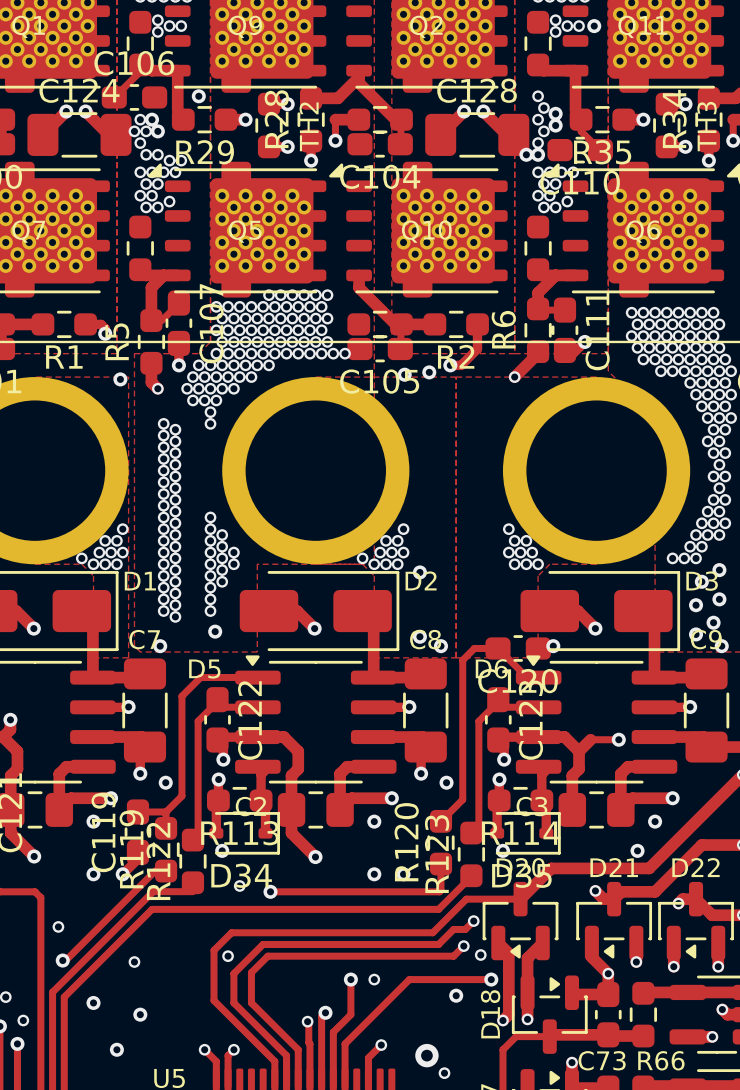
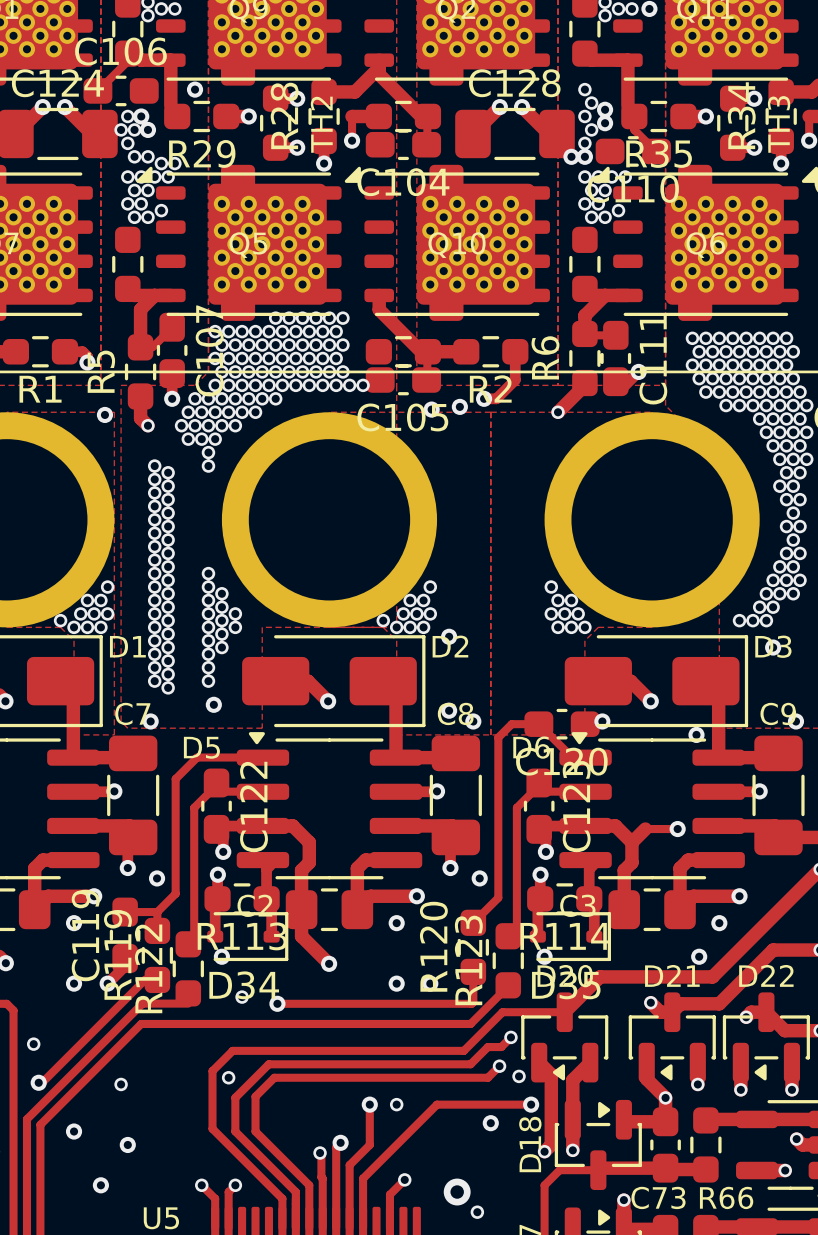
via: (719, 570) -> none
via: (719, 599) -> none
via: (696, 605) -> none
via: (713, 622) -> none
via: (696, 634) -> none
via: none -> (696, 734)

